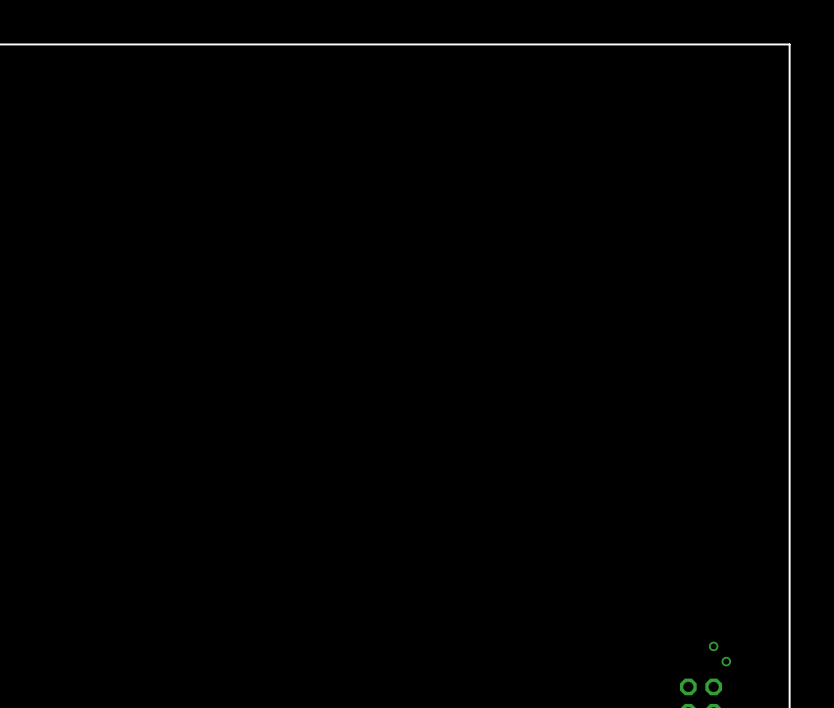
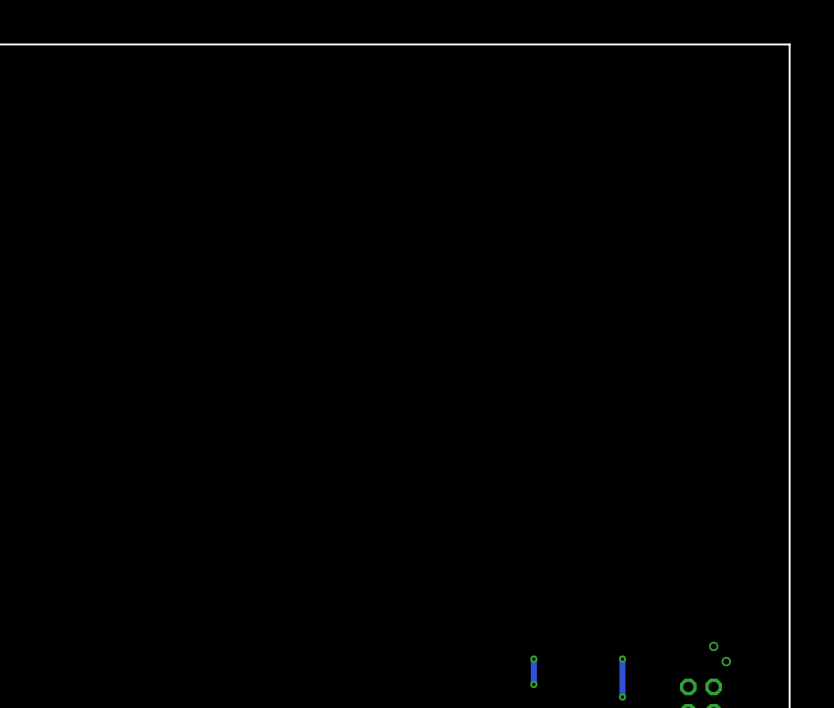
track: none -> (533, 659) (533, 684)
via: none -> (533, 659)
track: none -> (622, 659) (622, 697)
via: none -> (622, 659)
via: none -> (533, 684)
via: none -> (622, 697)

